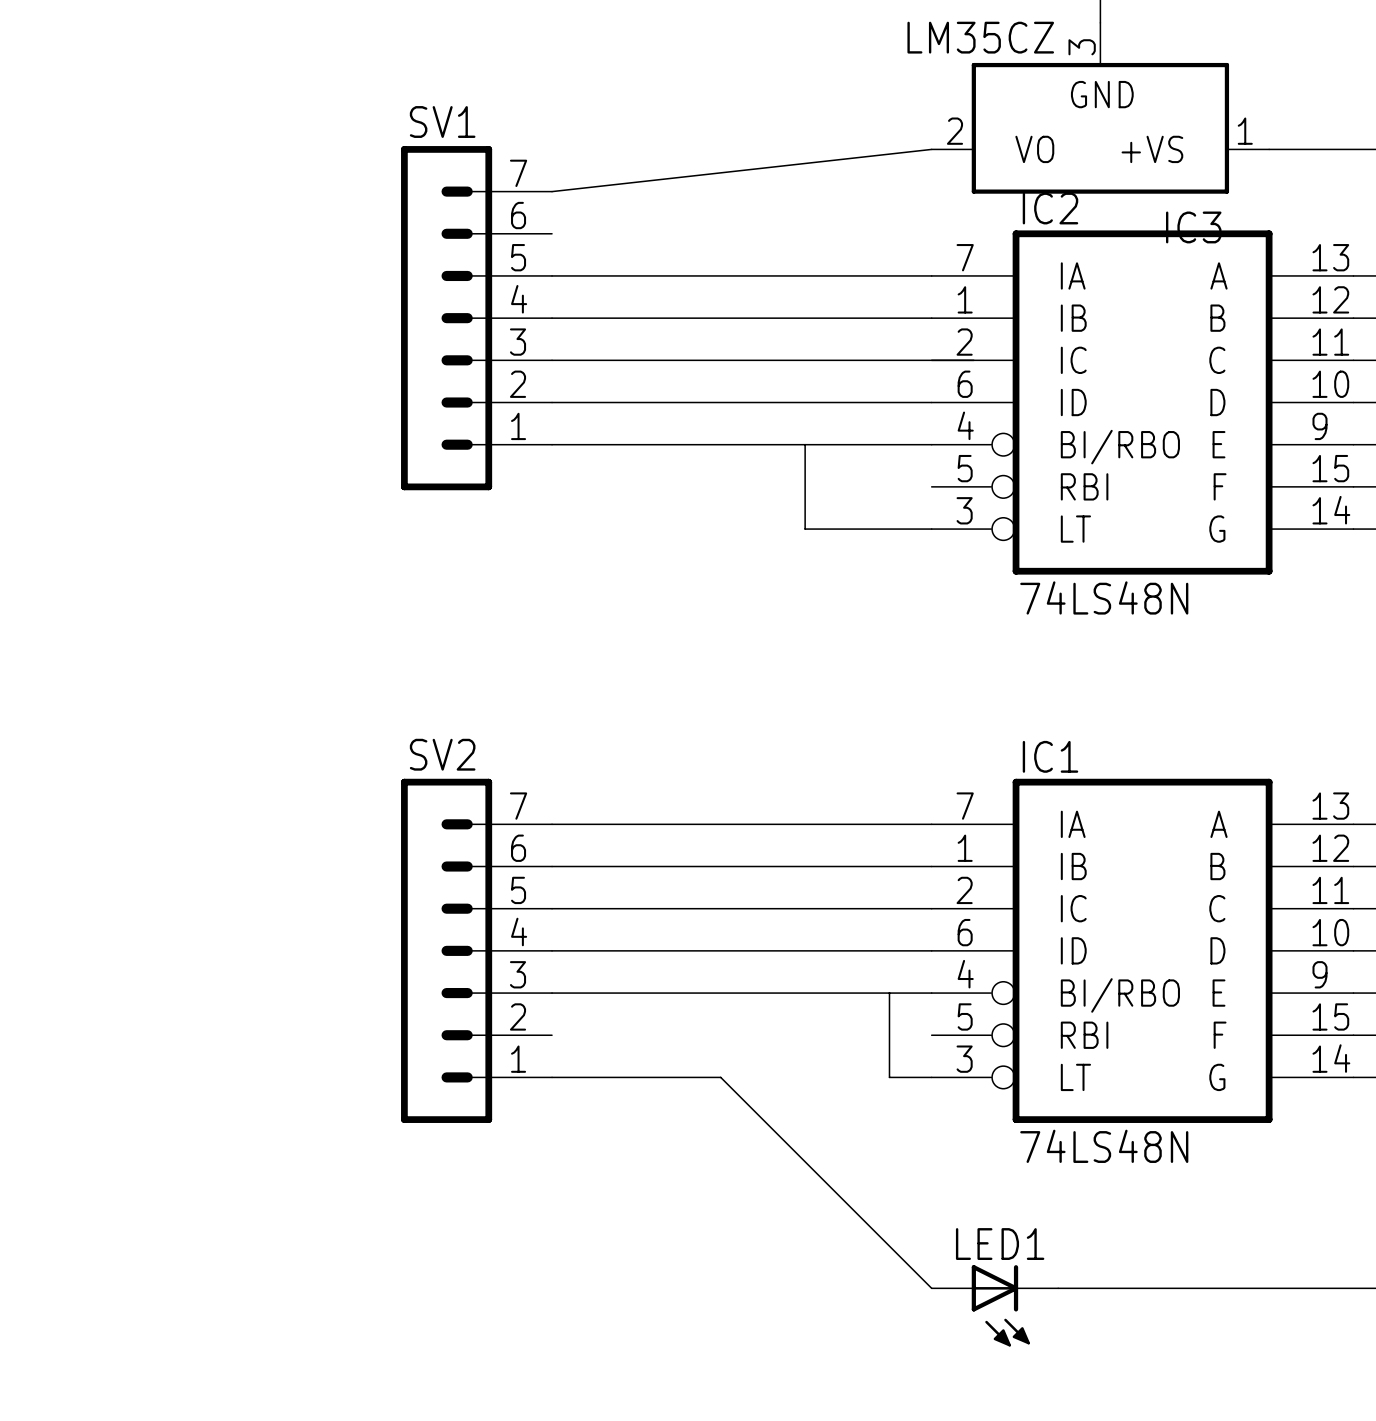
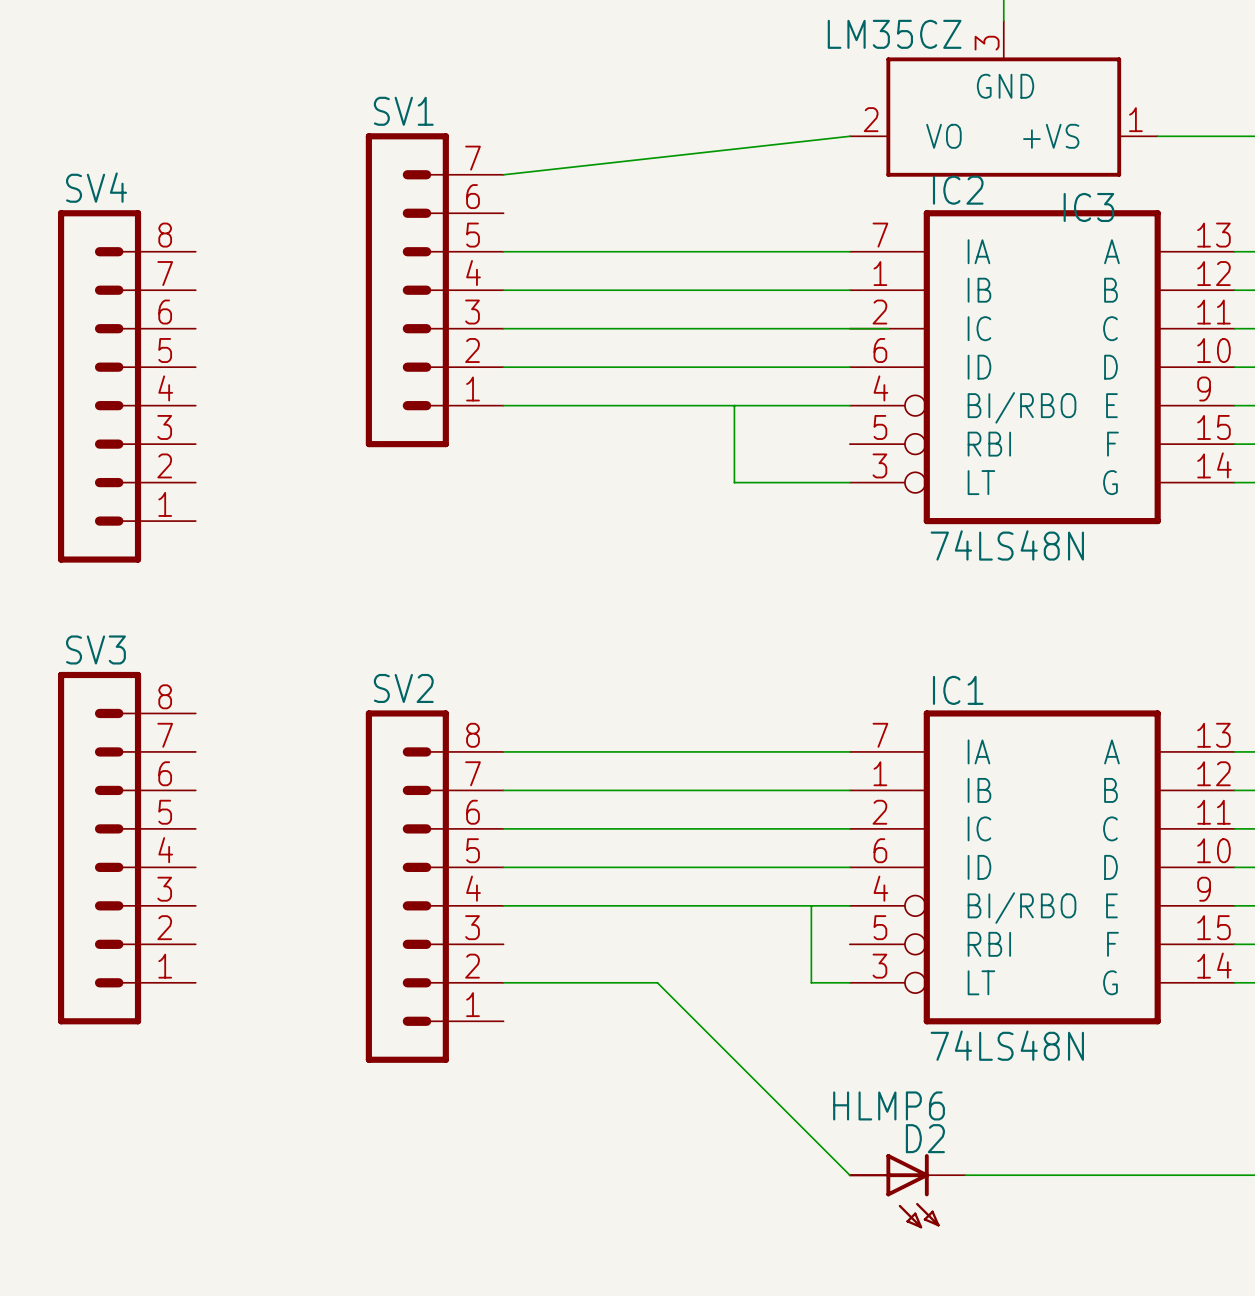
SV4: none -> (126, 386)
SV2 symbol: [401, 778, 553, 1123] -> [365, 710, 504, 1063]
SV3: none -> (126, 848)
LED1: (994, 1305) -> none
D2: none -> HLMP6 (907, 1191)

